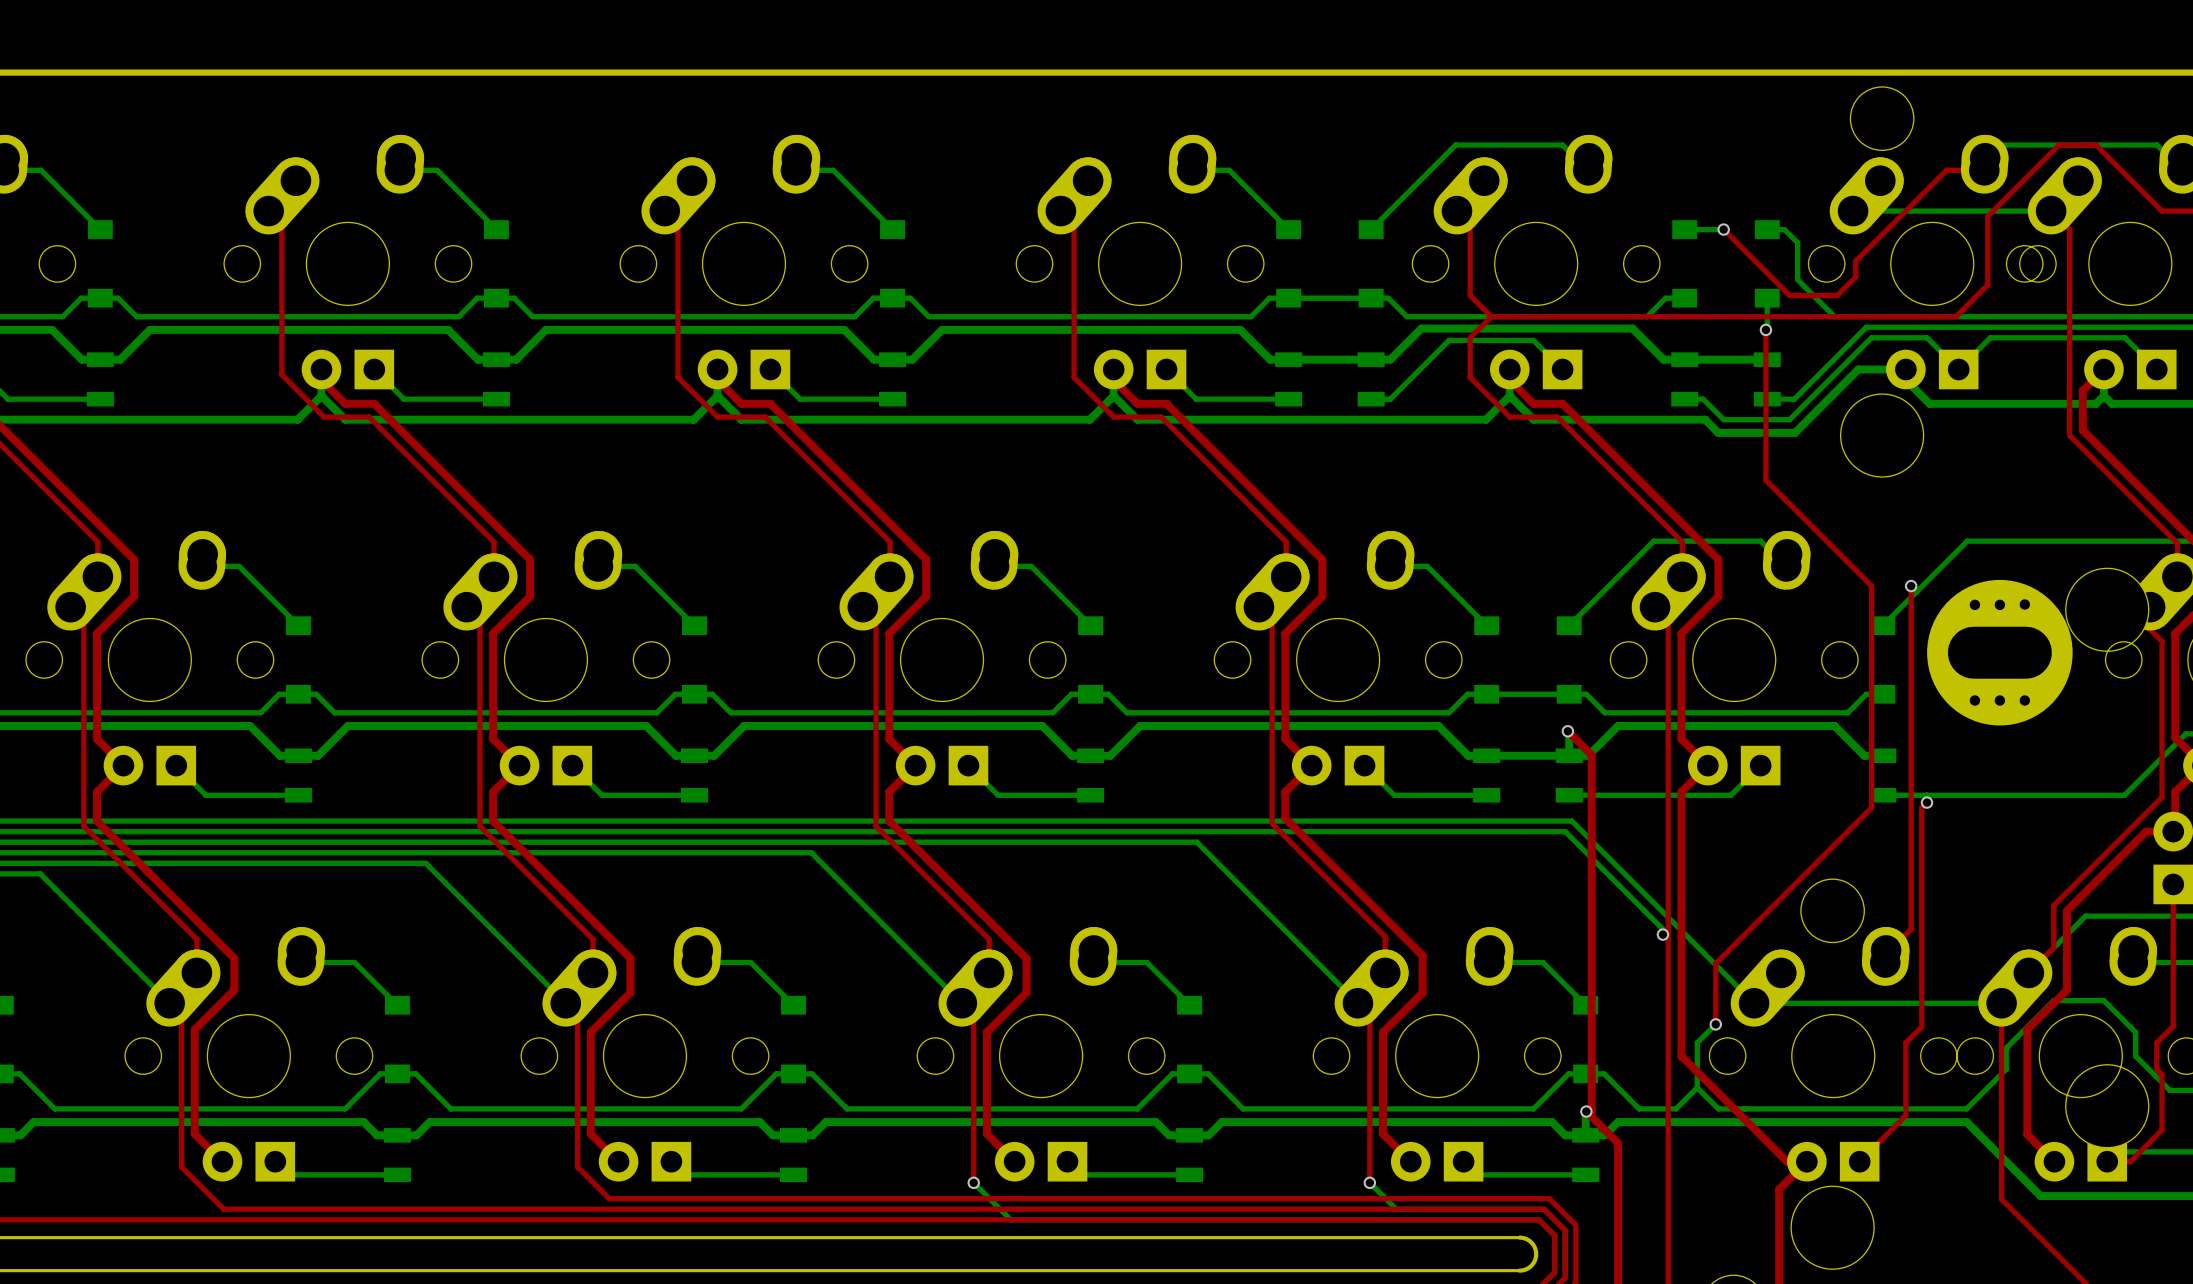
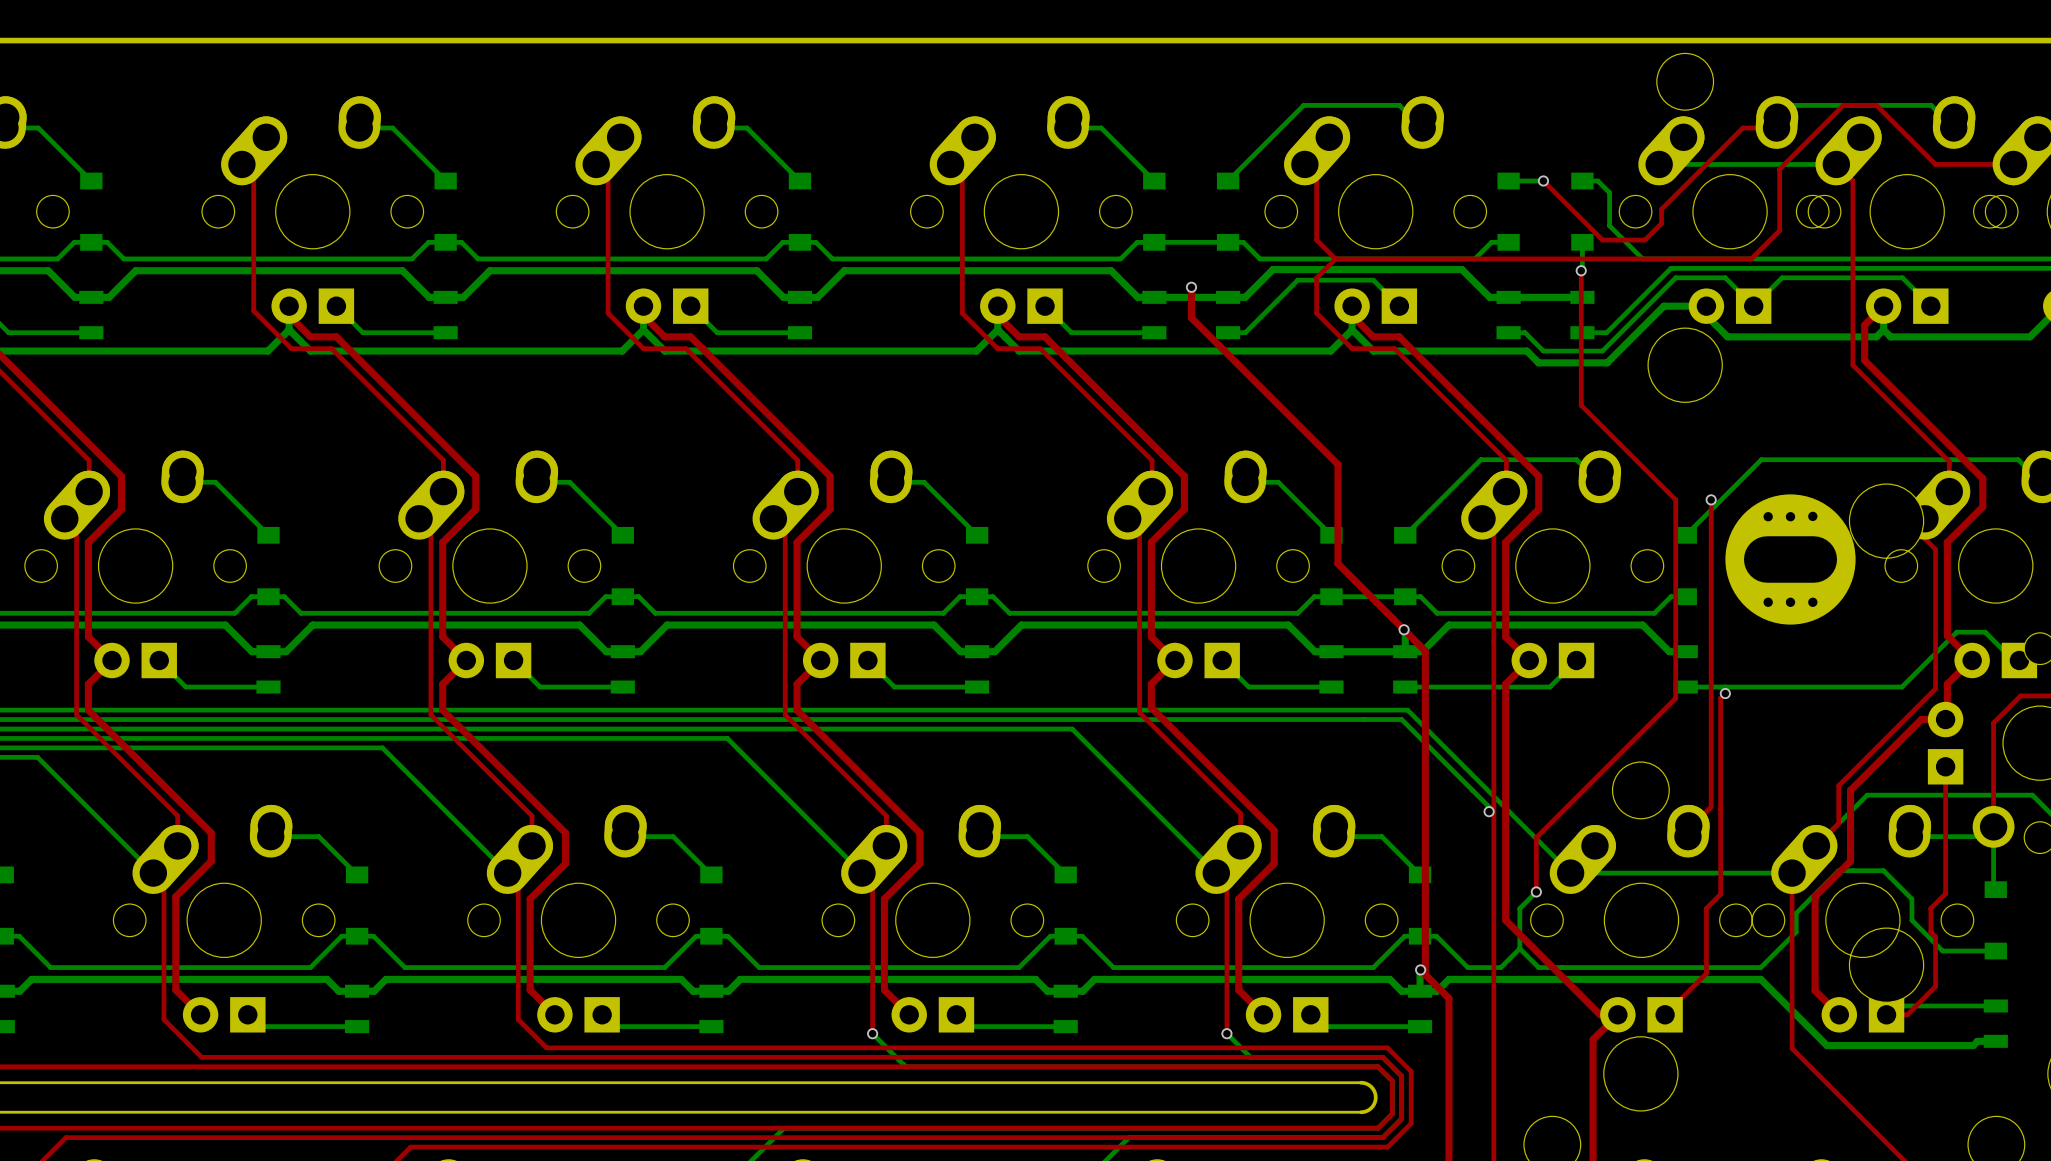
top track: none -> (1191, 287) (1191, 317) (1337, 464) (1337, 563) (1404, 629)
via: none -> (1191, 287)

